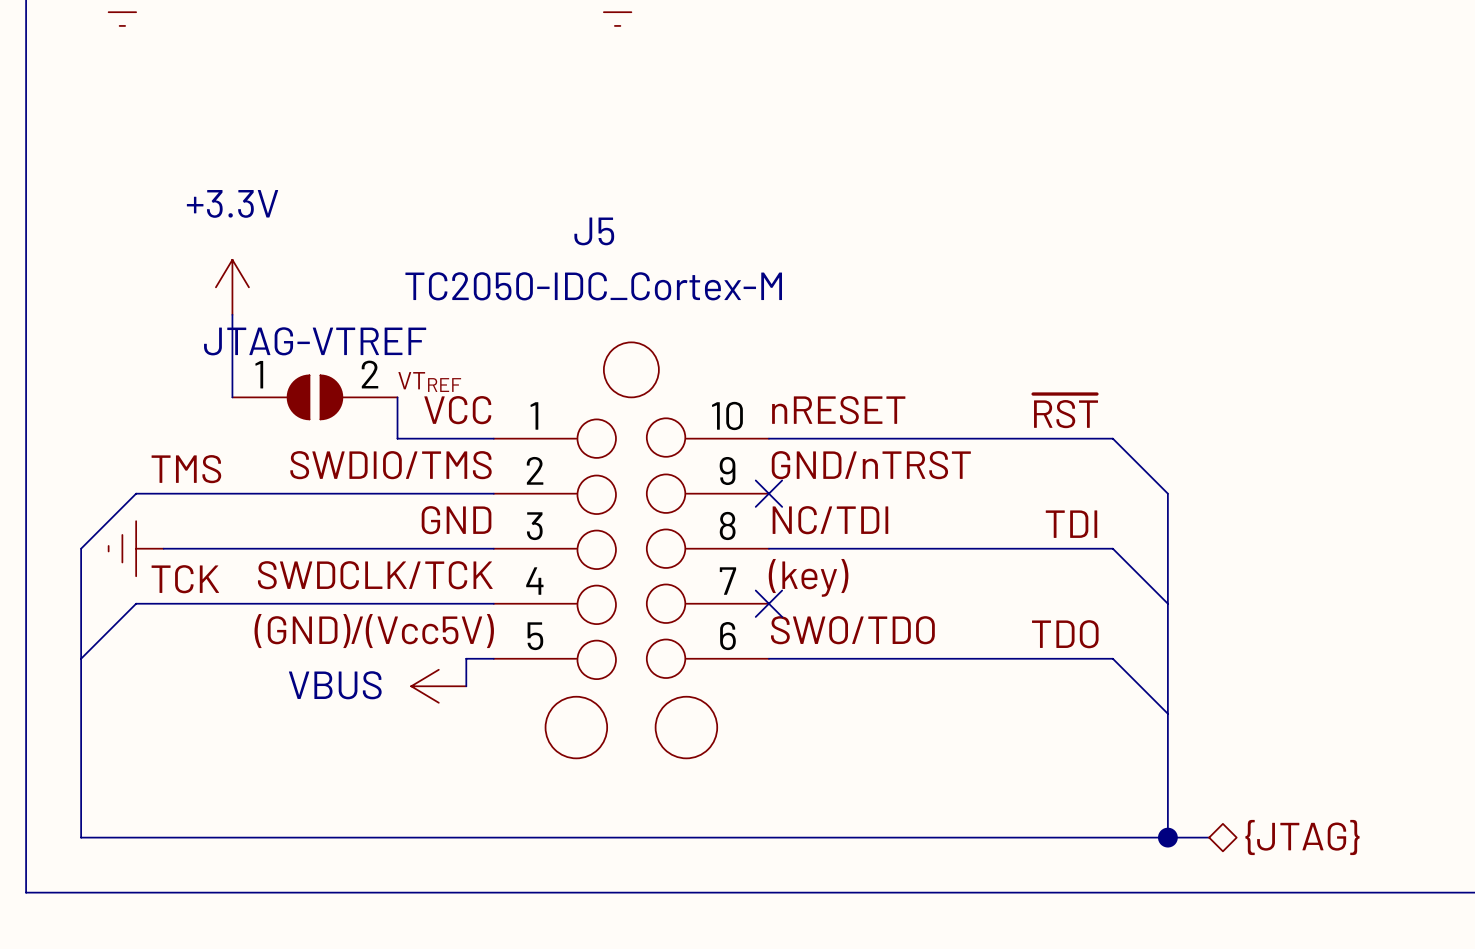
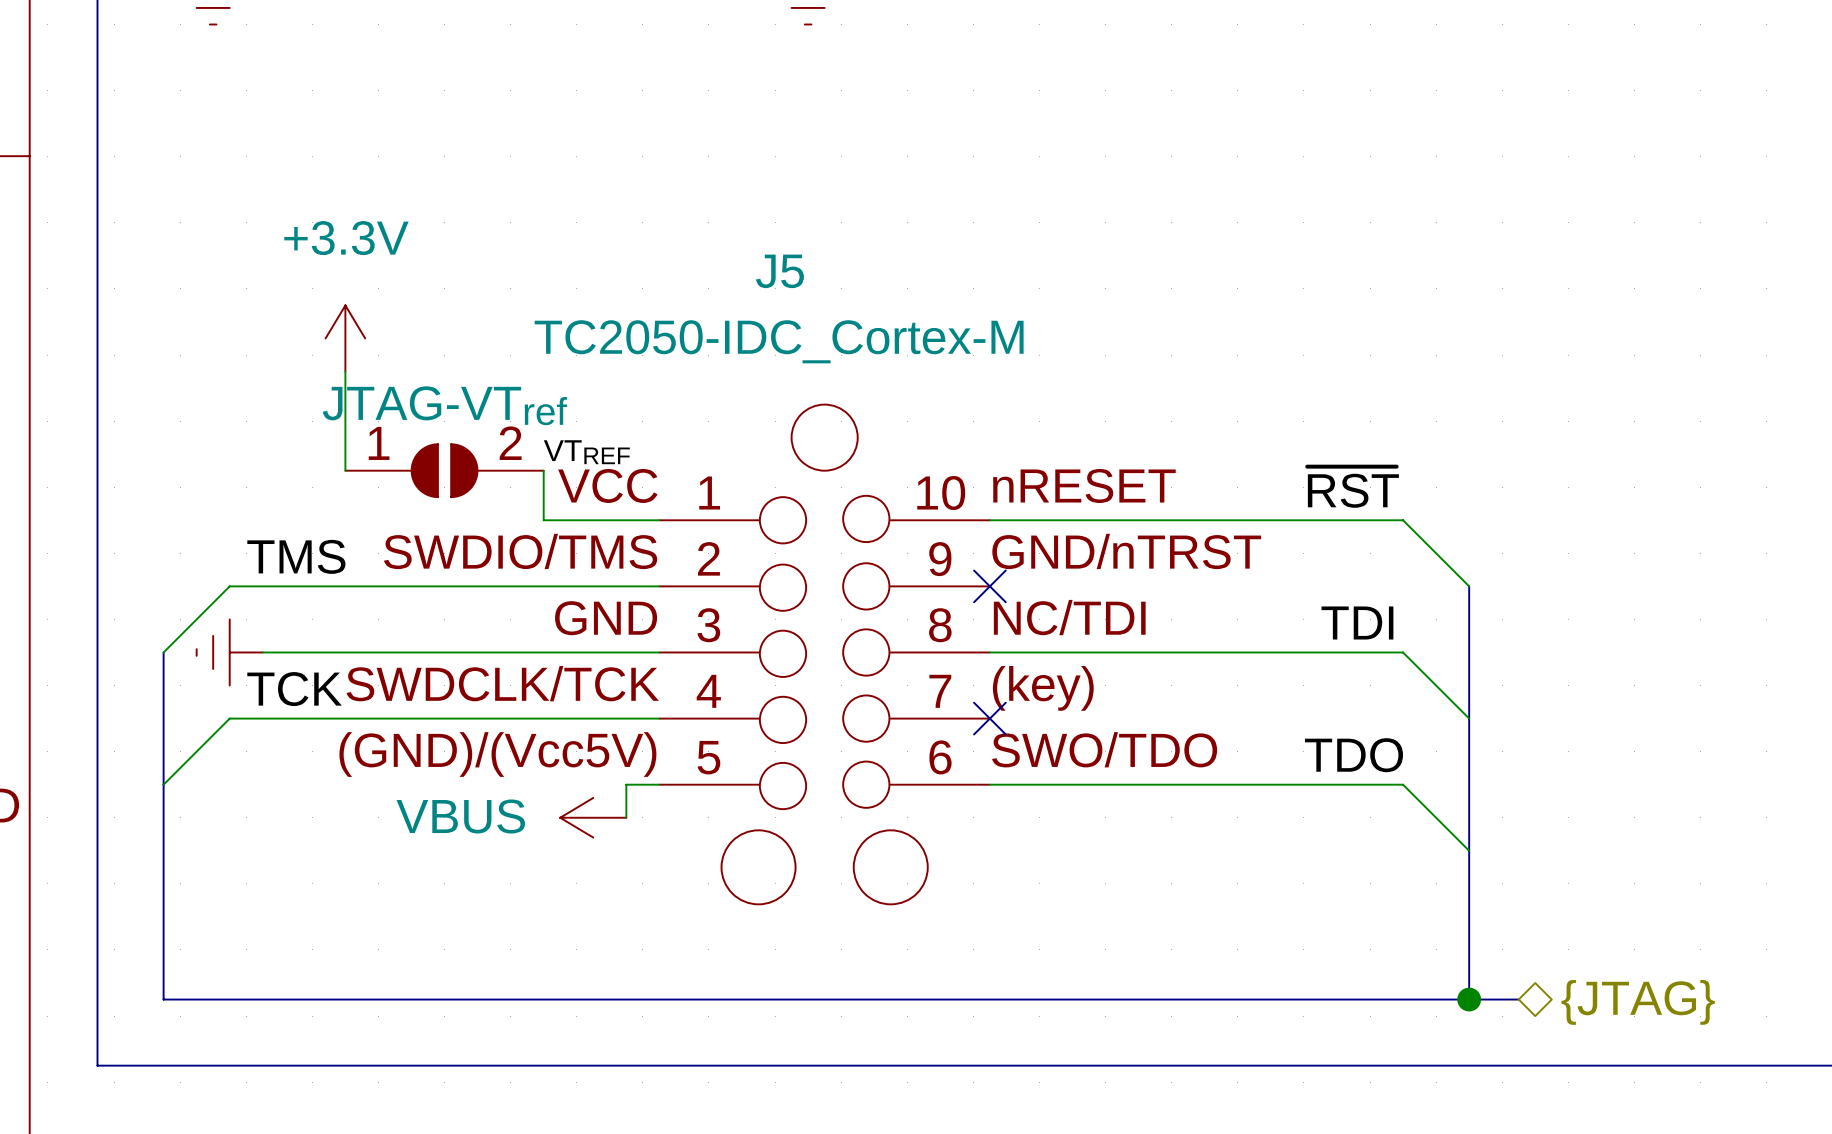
part value: JTAG-VTREF (315, 341) -> JTAG-VTref (444, 405)

